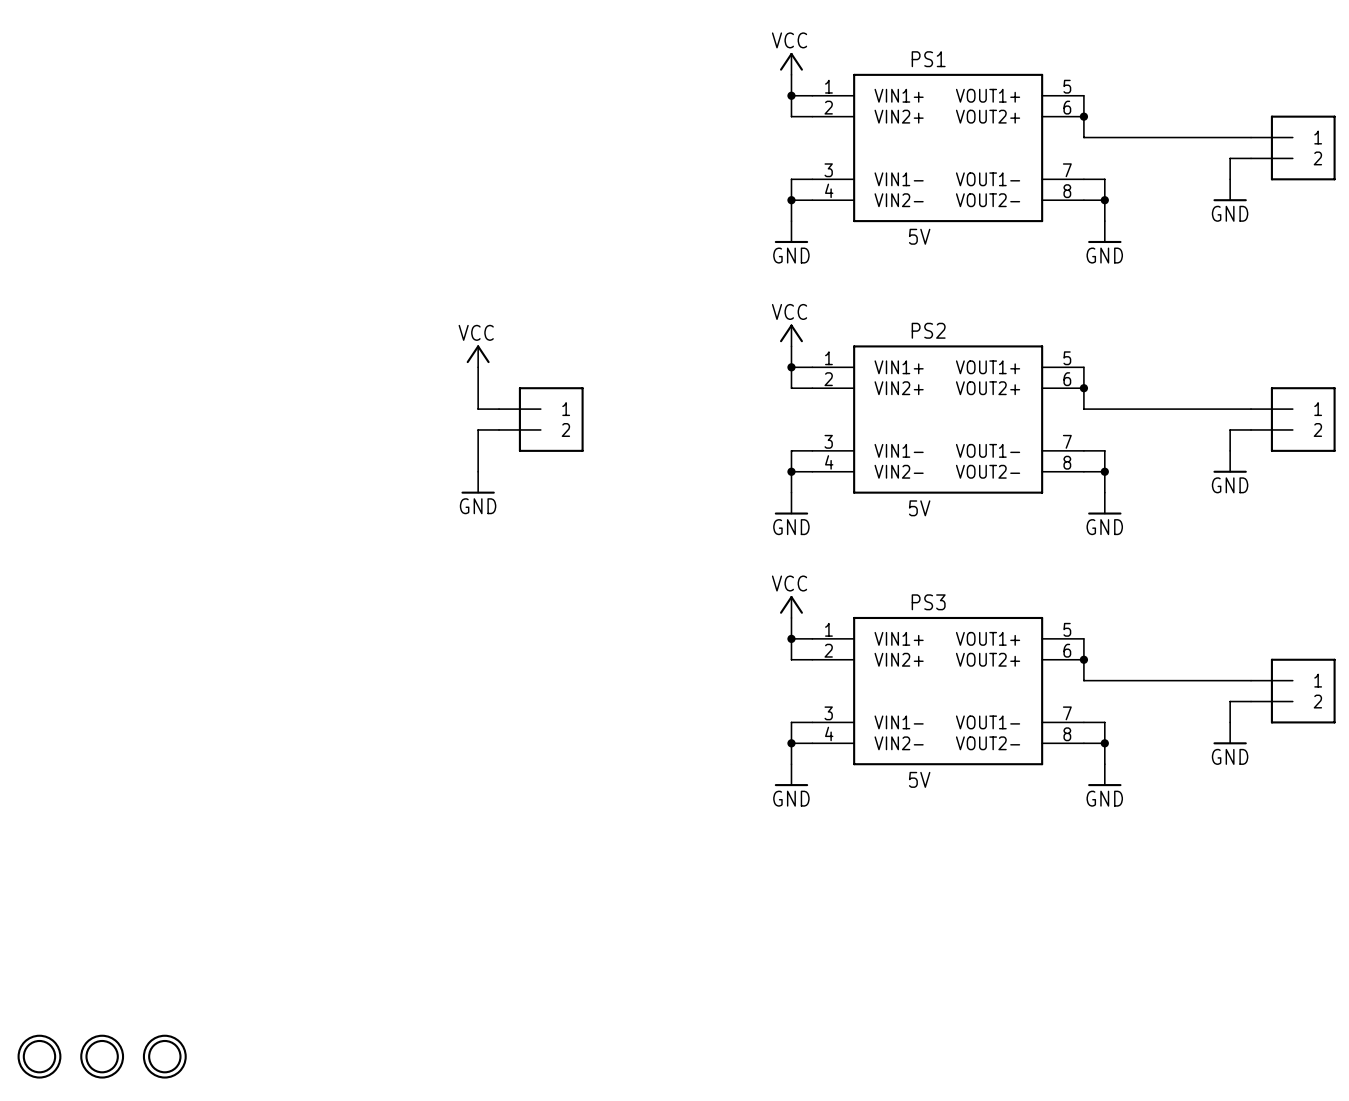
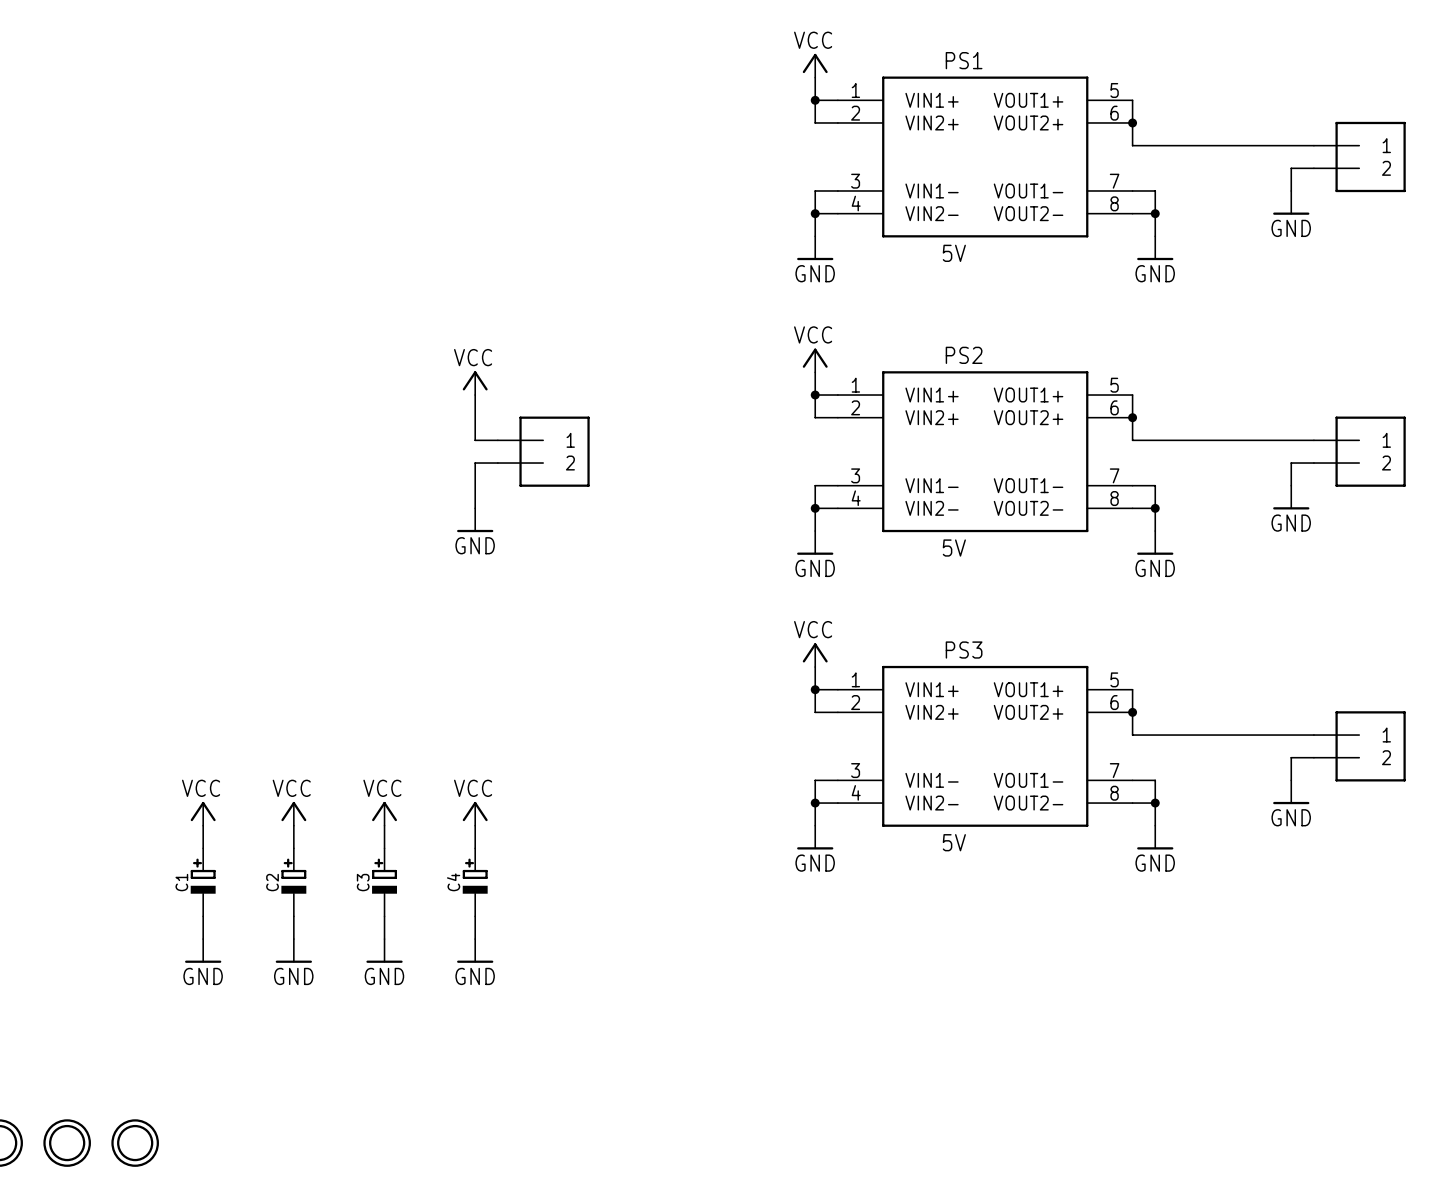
power symbol: none -> VCC (203, 813)
power symbol: none -> VCC (293, 813)
power symbol: none -> VCC (384, 813)
power symbol: none -> VCC (475, 813)
wire: none -> (203, 825) (203, 848)
wire: none -> (293, 825) (293, 848)
wire: none -> (384, 825) (384, 848)
wire: none -> (475, 825) (475, 848)
C1: none -> (203, 882)
C2: none -> (293, 882)
C3: none -> (384, 882)
C4: none -> (475, 882)
wire: none -> (203, 916) (203, 939)
wire: none -> (293, 916) (293, 939)
wire: none -> (384, 916) (384, 939)
wire: none -> (475, 916) (475, 939)
power symbol: none -> GND (203, 950)
power symbol: none -> GND (293, 950)
power symbol: none -> GND (384, 950)
power symbol: none -> GND (475, 950)

